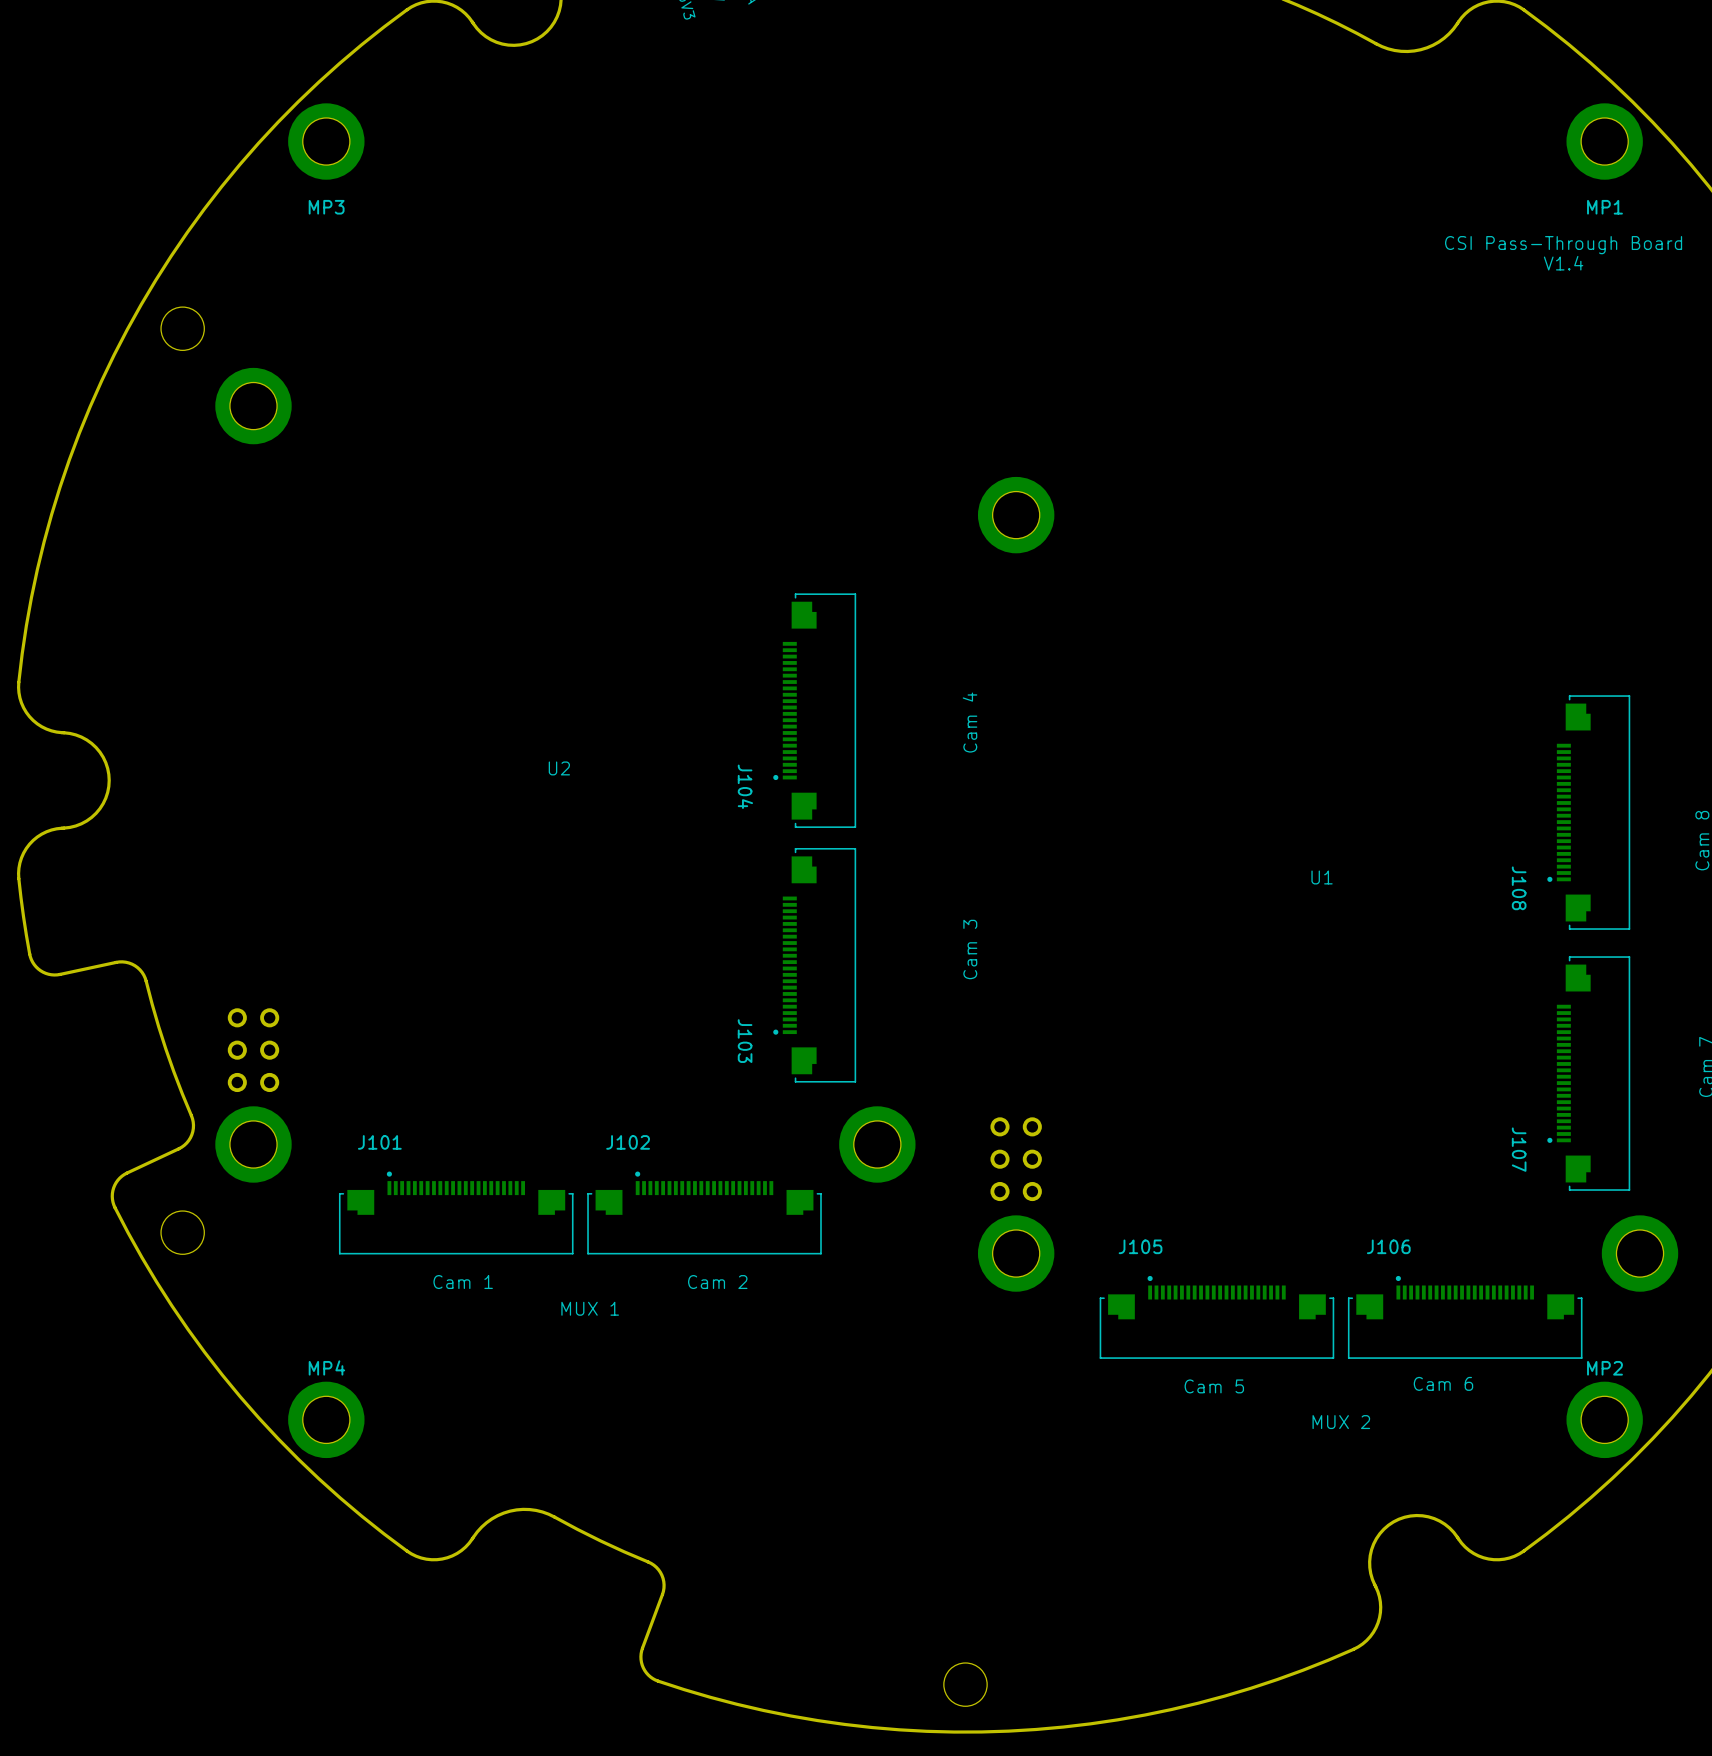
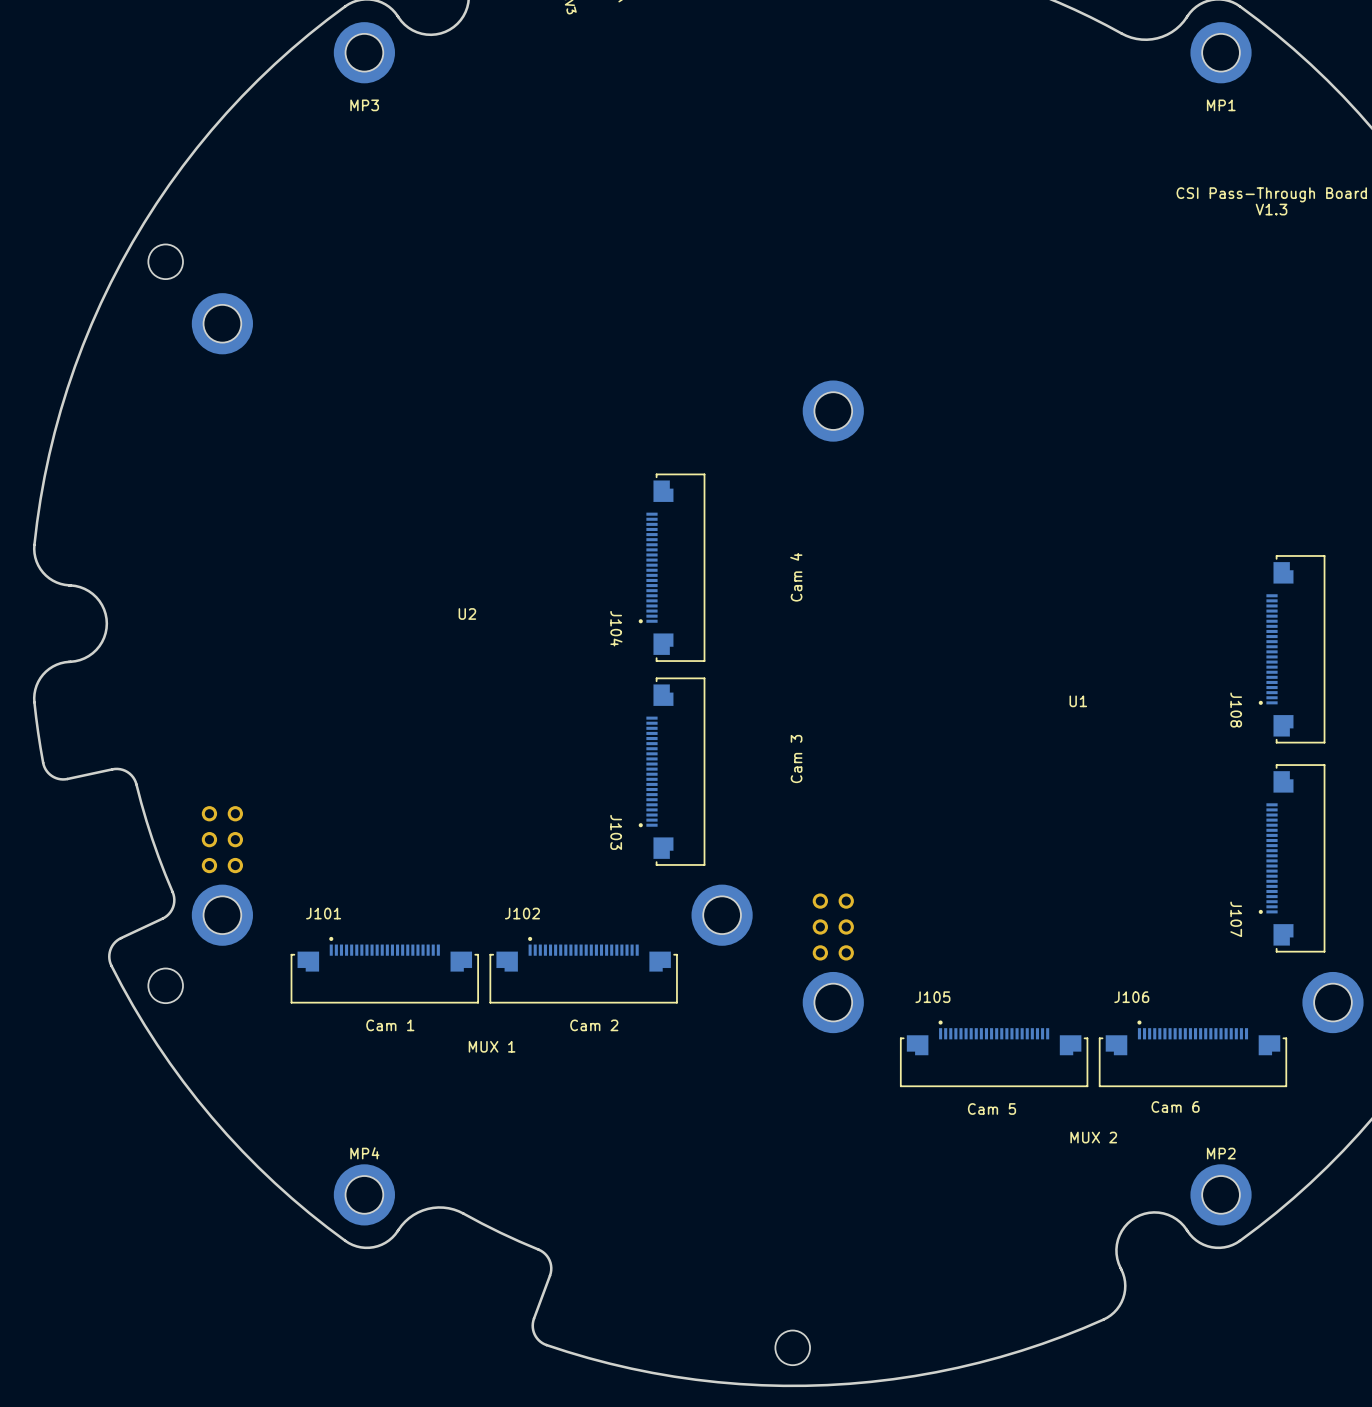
MP3 position: (326, 141) -> (364, 52)
MP1 position: (1604, 141) -> (1221, 52)
text: V1.4 (1563, 263) -> V1.3 (1271, 209)
MP4 position: (326, 1419) -> (364, 1194)
MP2 position: (1604, 1419) -> (1221, 1194)

